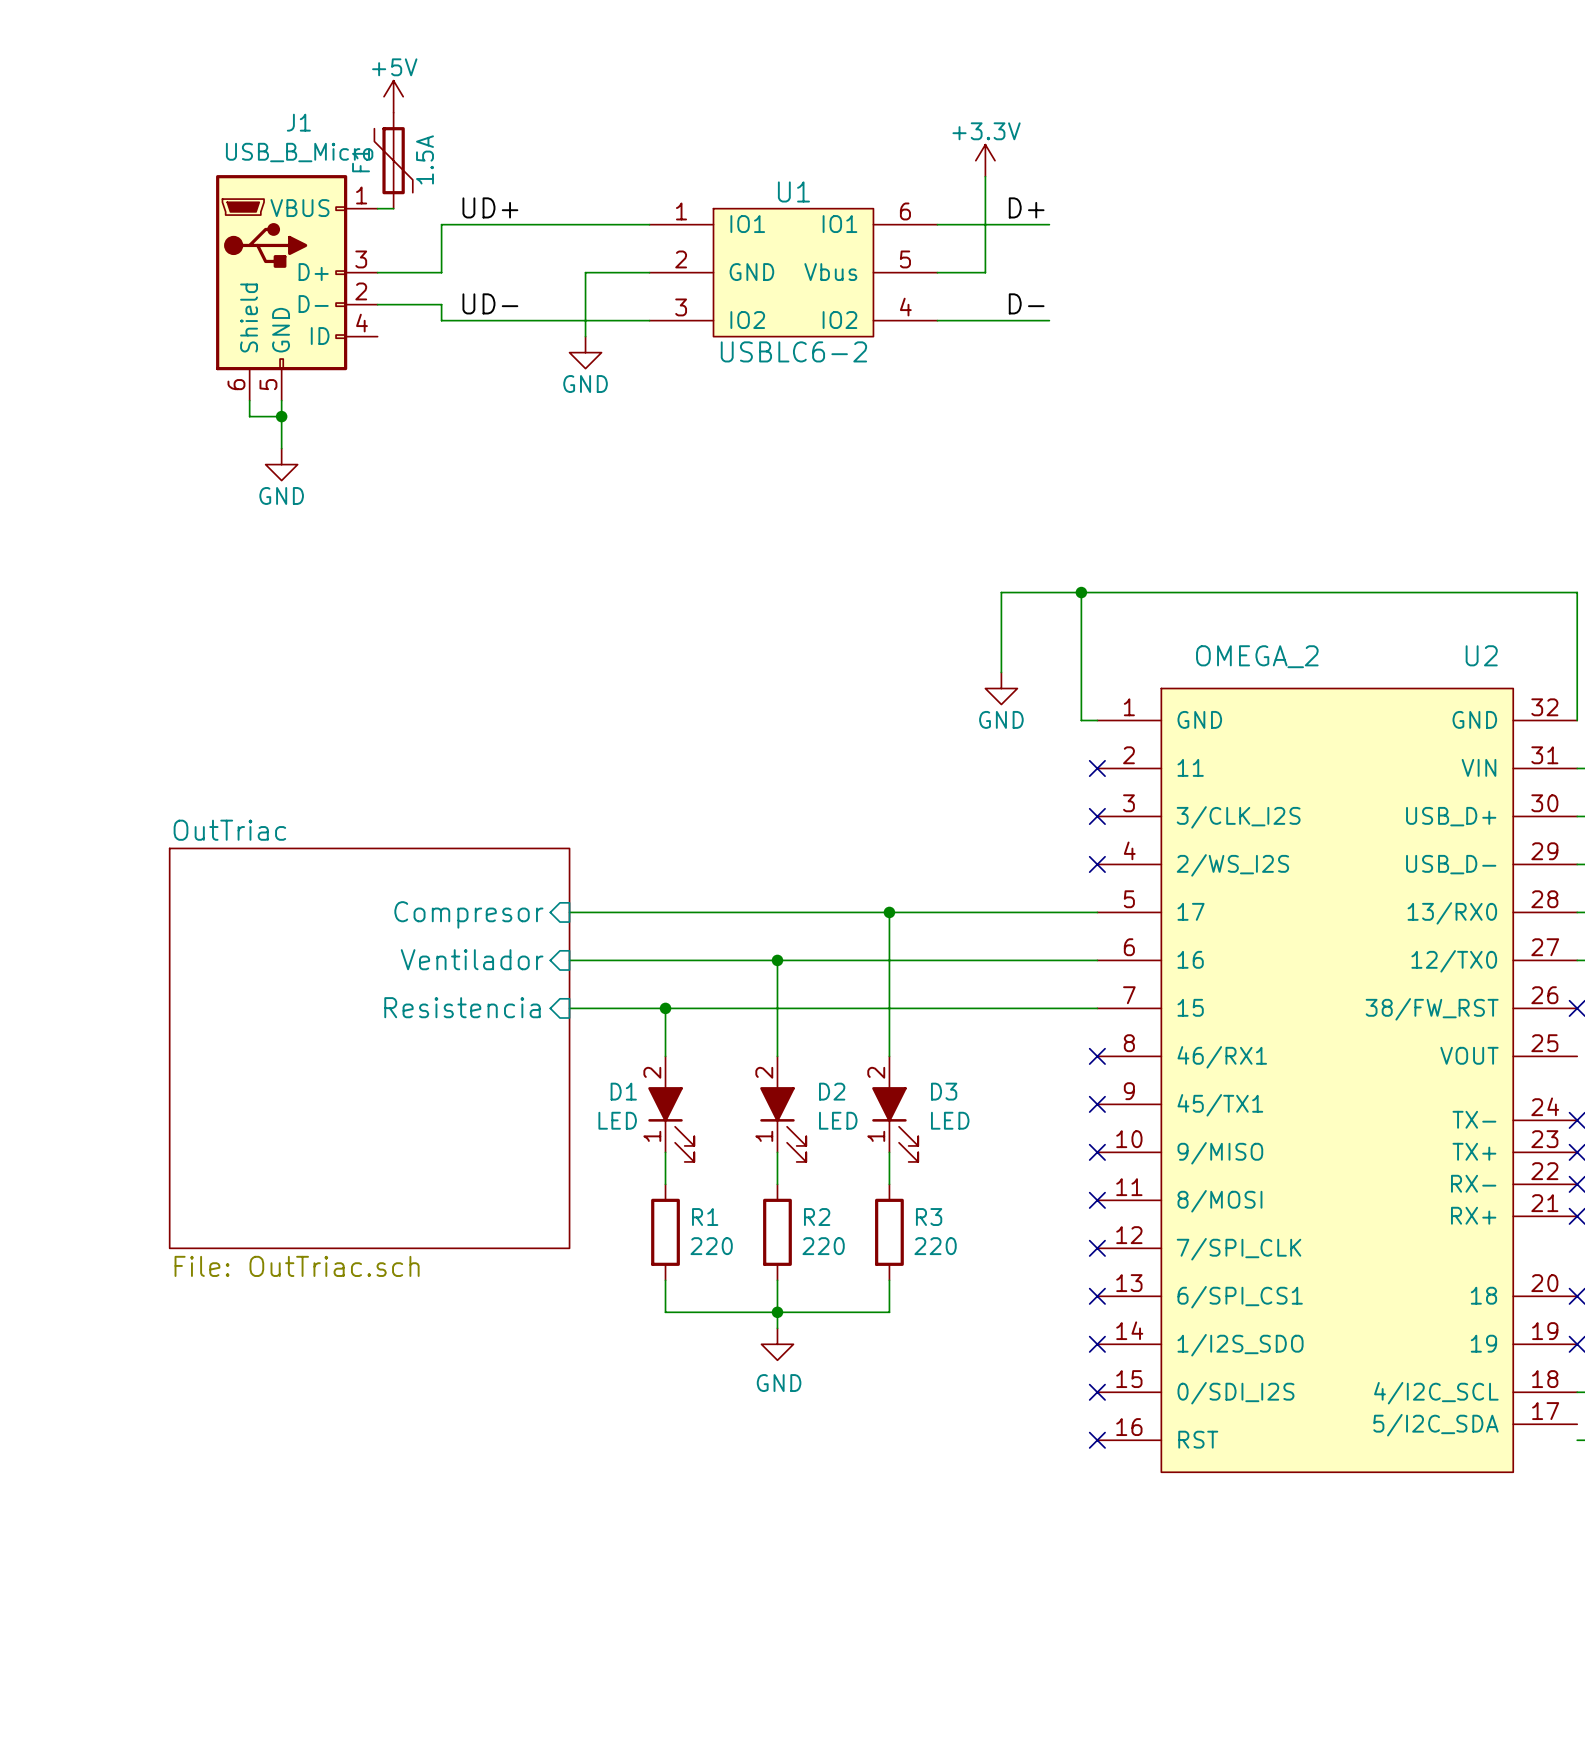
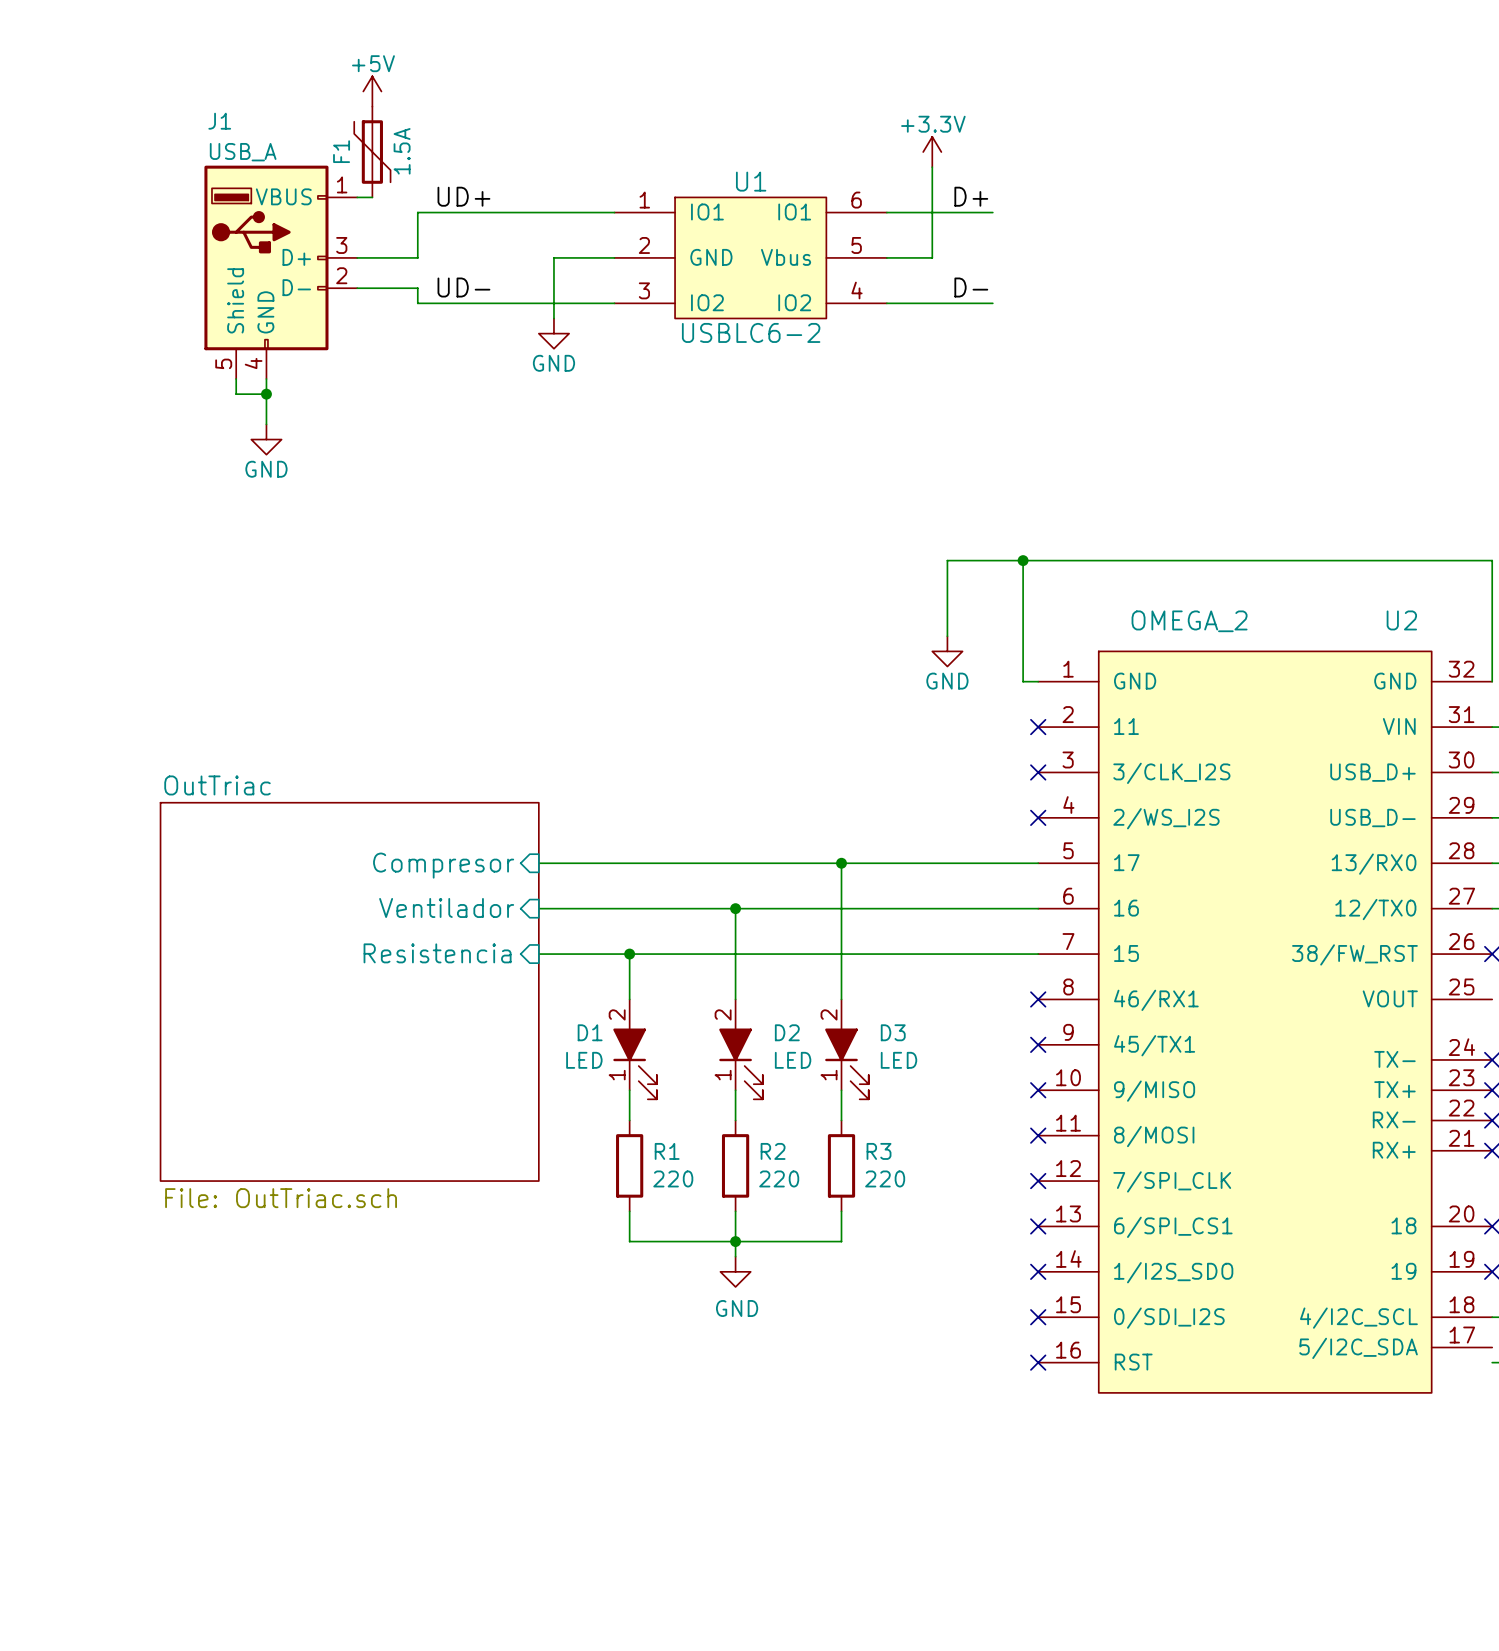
J1 name position: J1 (298, 122) -> J1 (219, 121)
J1 value: USB_B_Micro (299, 152) -> USB_A (243, 152)
J1 symbol: [216, 175, 378, 401] -> [204, 165, 358, 380]

